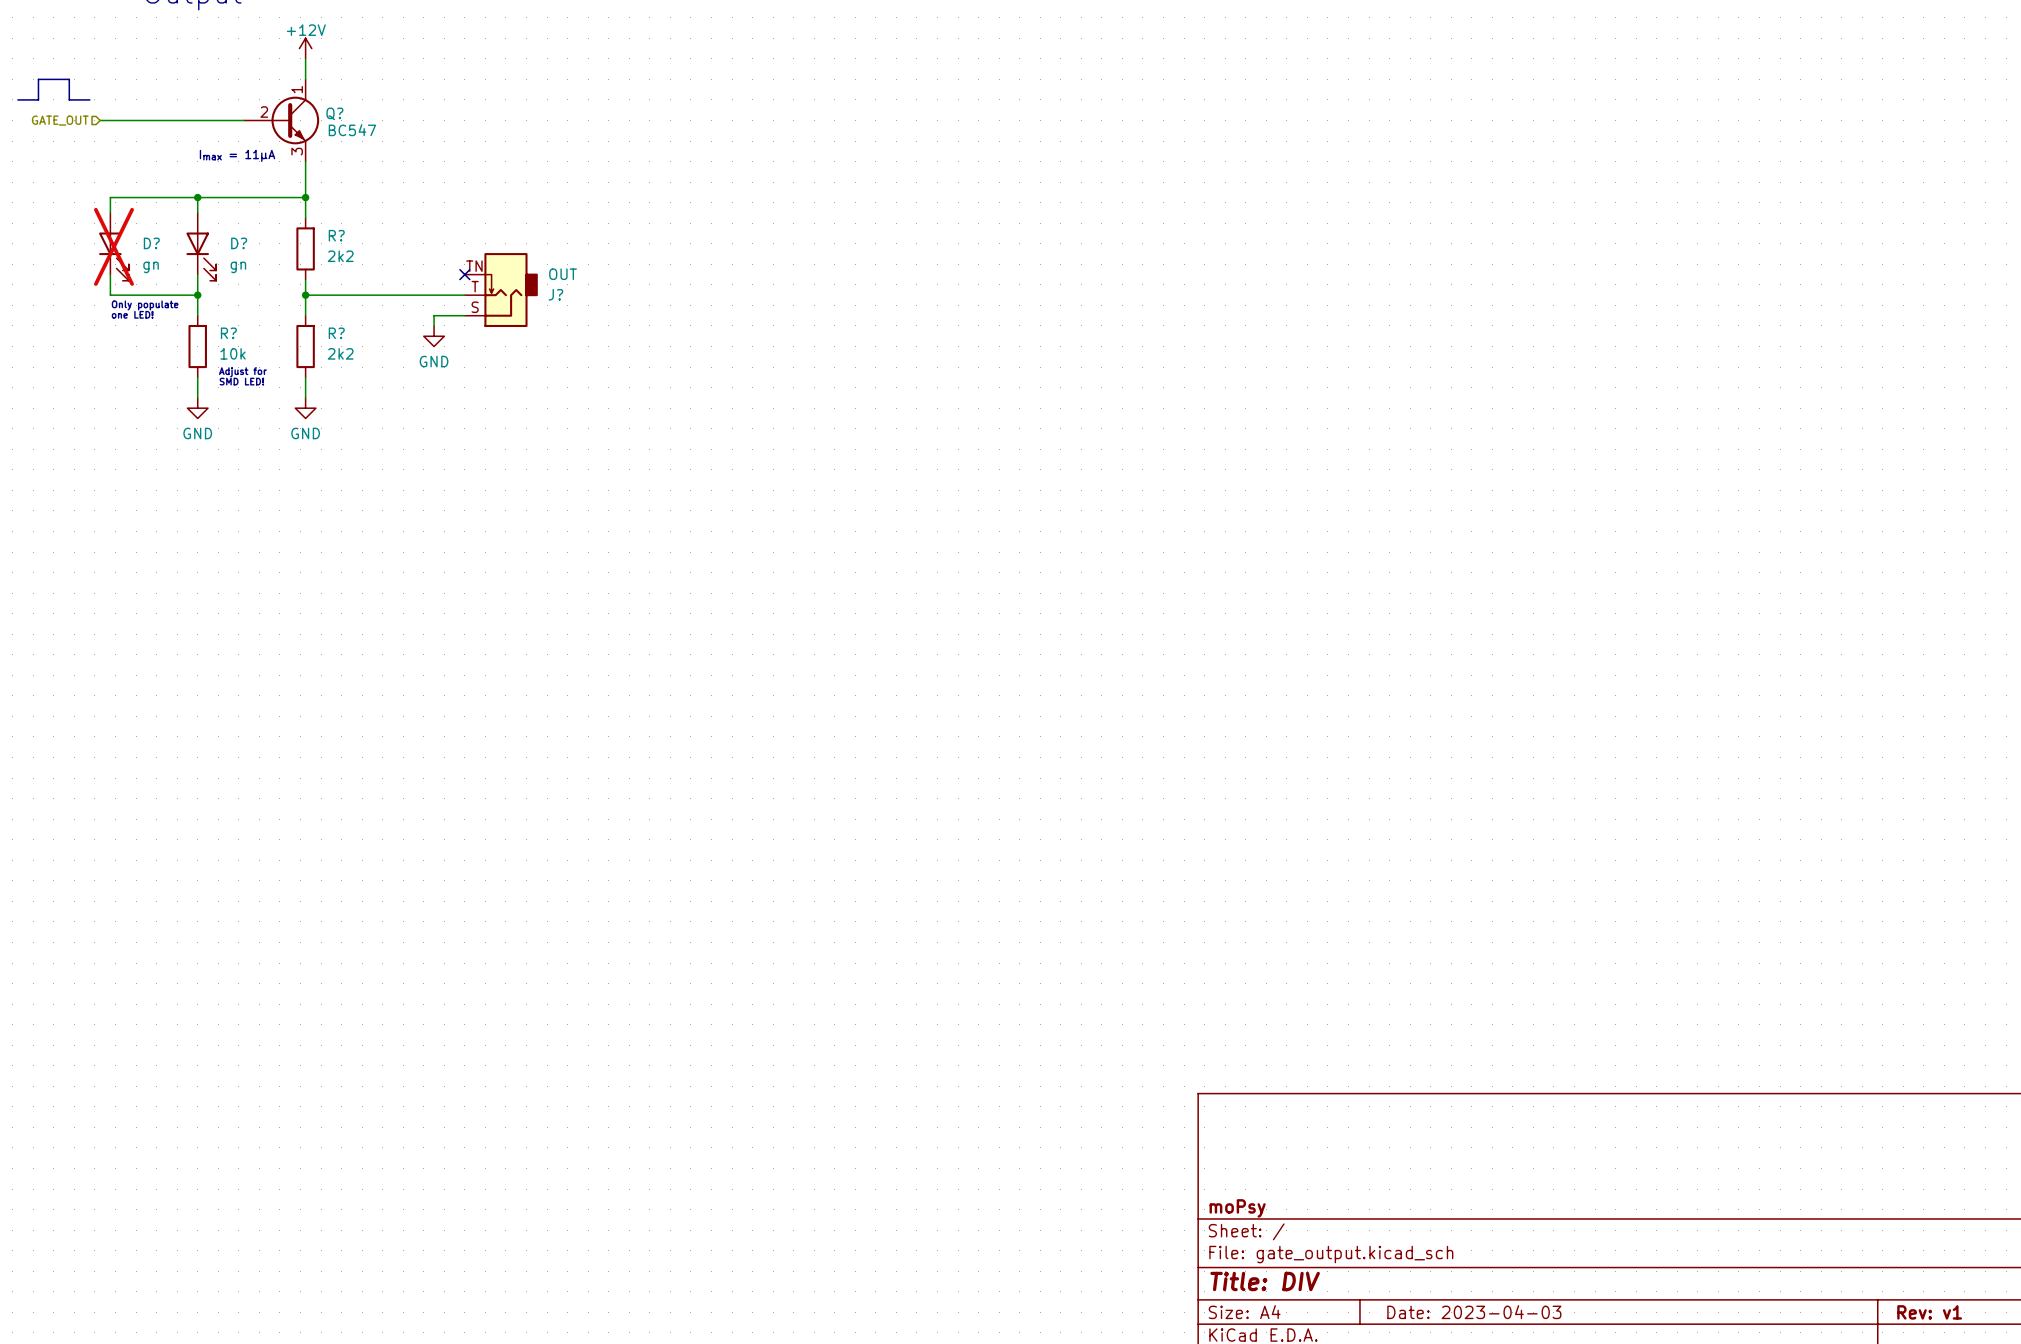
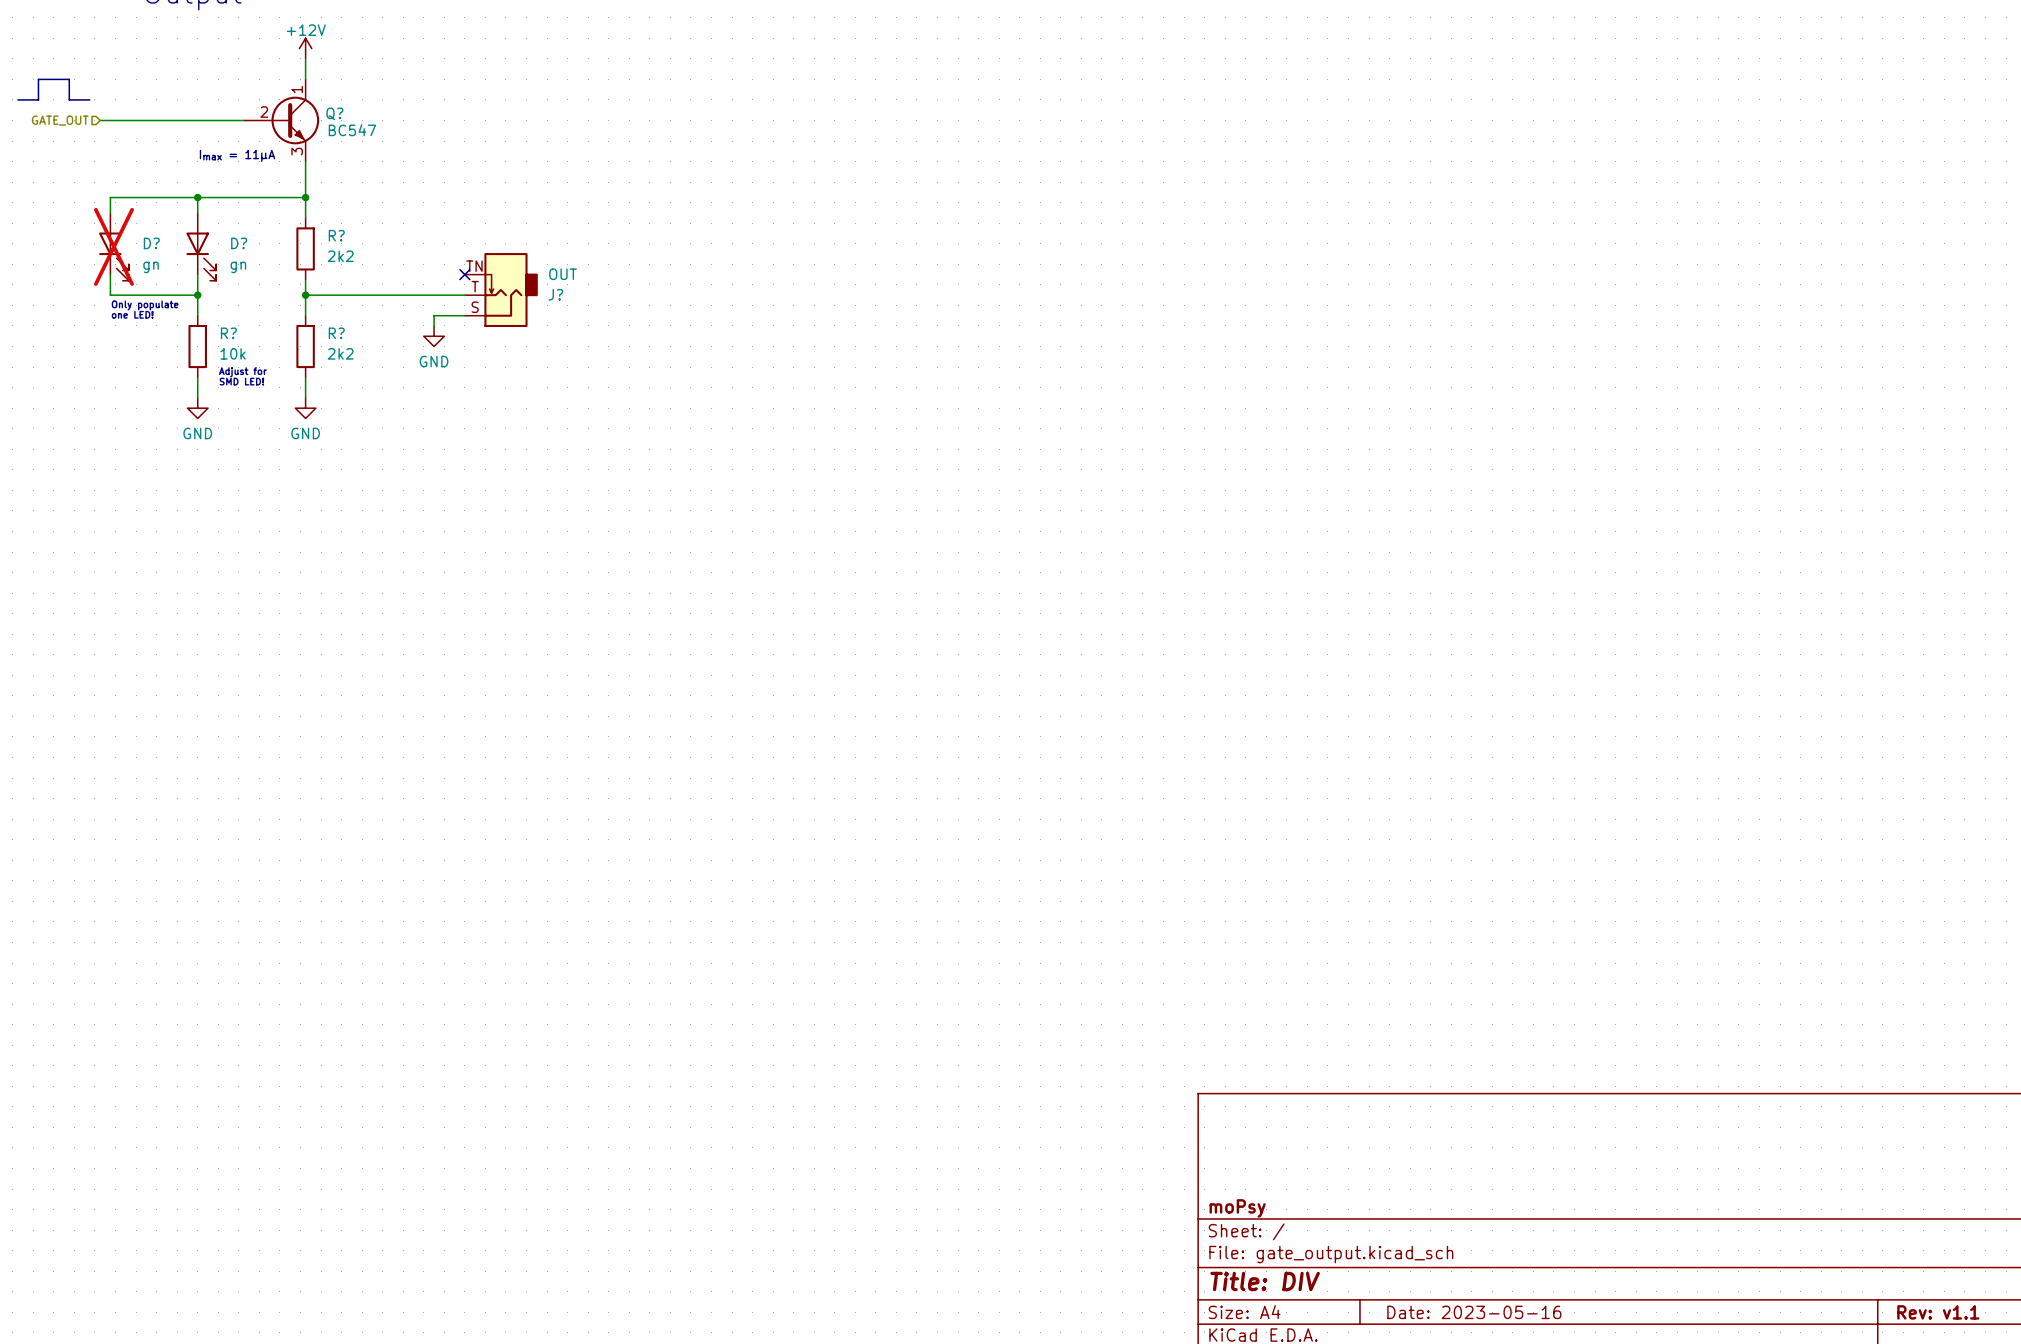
title block: Date: 2023-04-03 (1474, 1312) -> Date: 2023-05-16 (1474, 1312)
title block: Rev: v1 (1929, 1312) -> Rev: v1.1 (1938, 1312)

